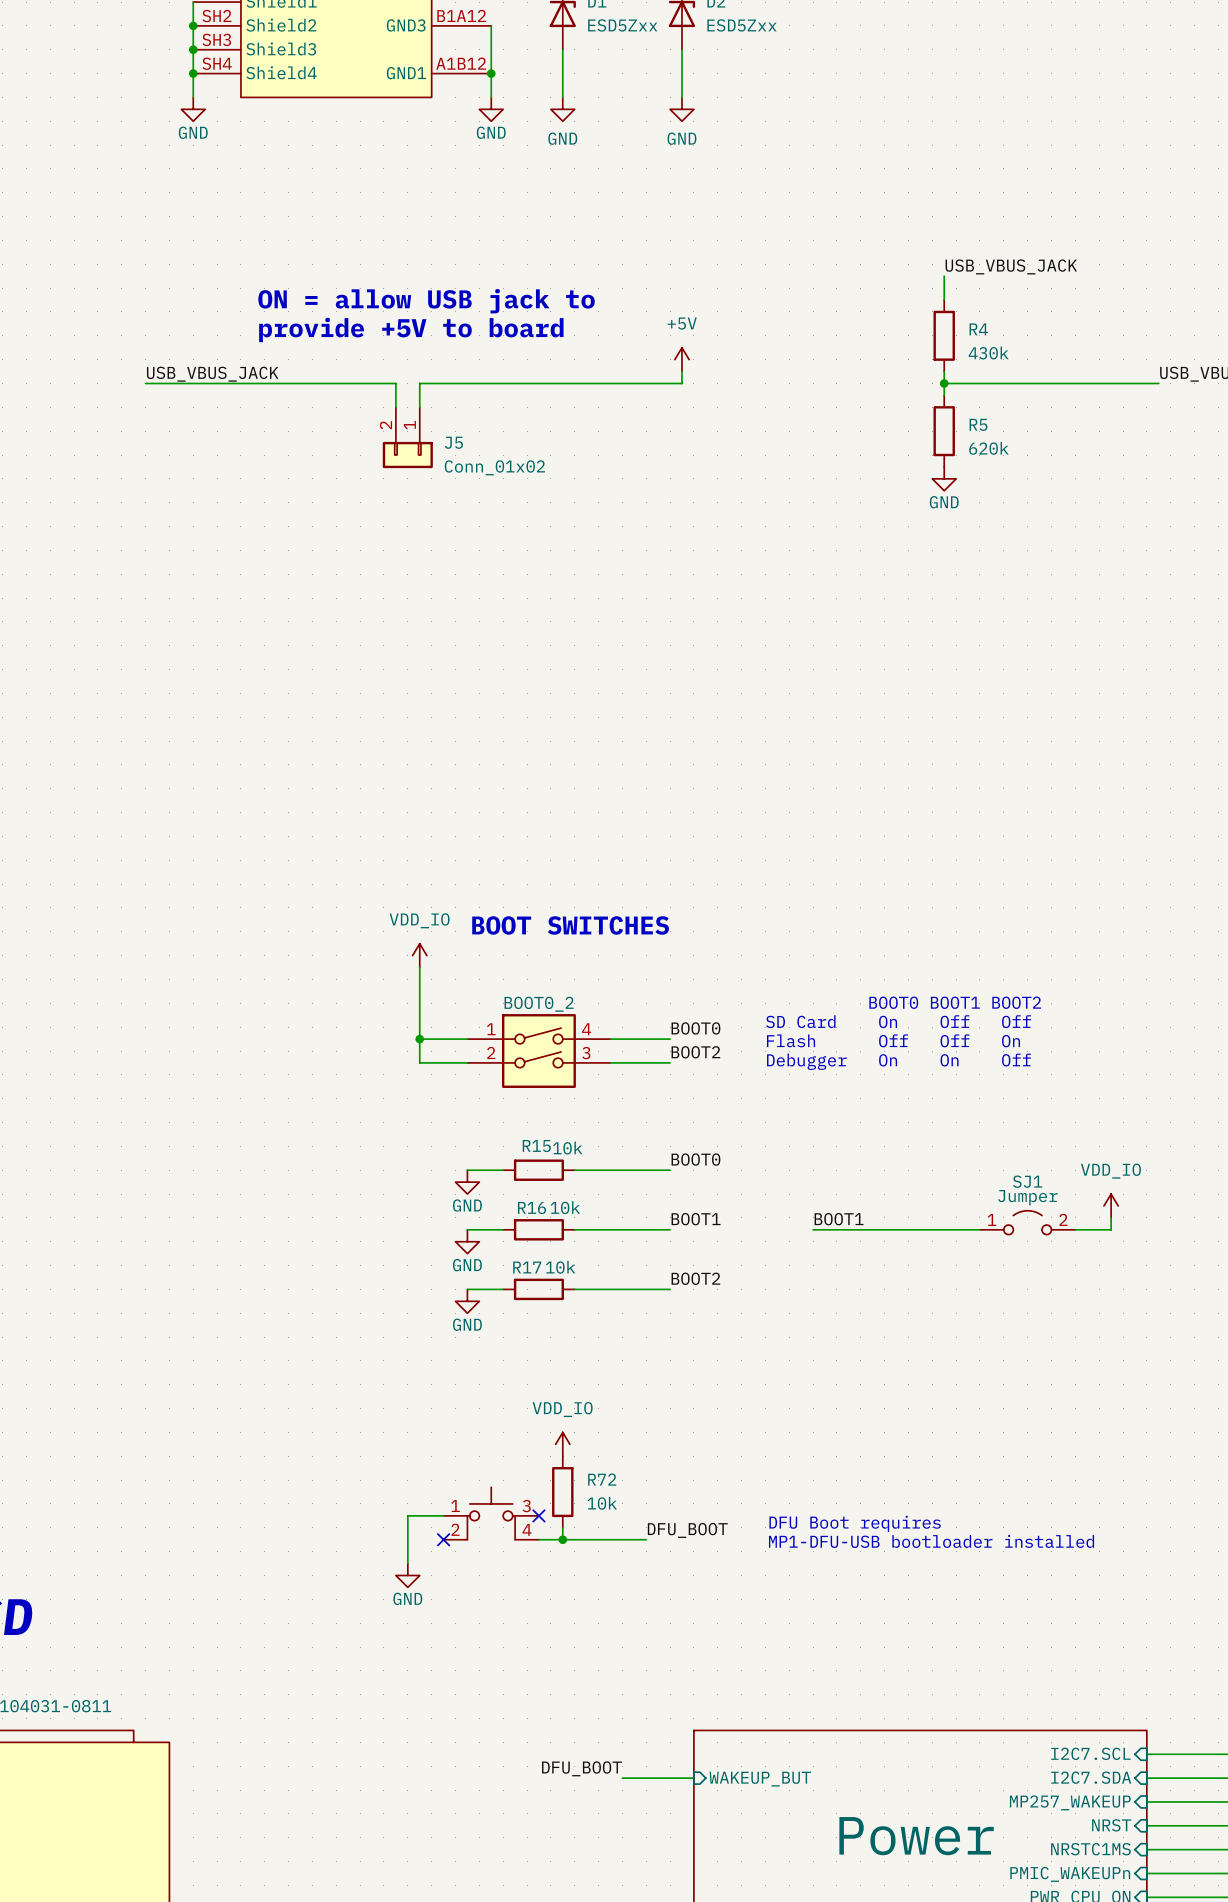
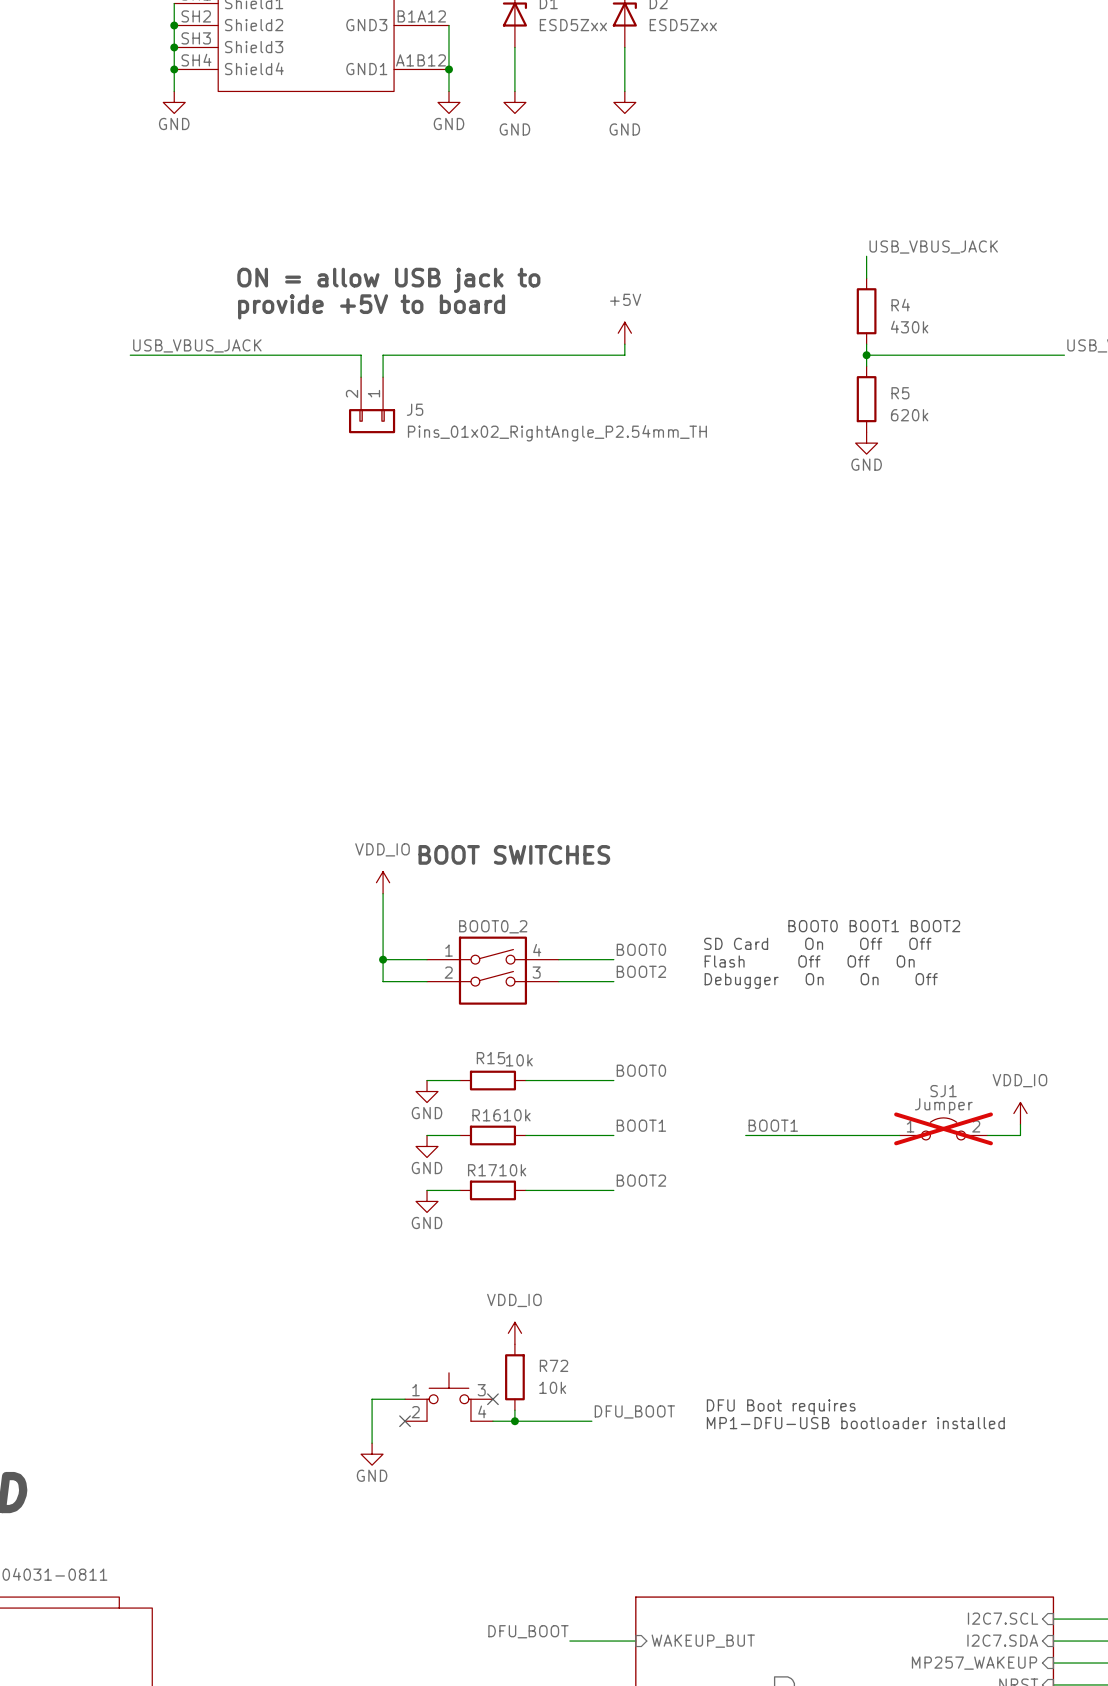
J5 value: Conn_01x02 (494, 467) -> Pins_01x02_RightAngle_P2.54mm_TH (557, 433)
SJ1 do-not-place cross: none -> (943, 1128)

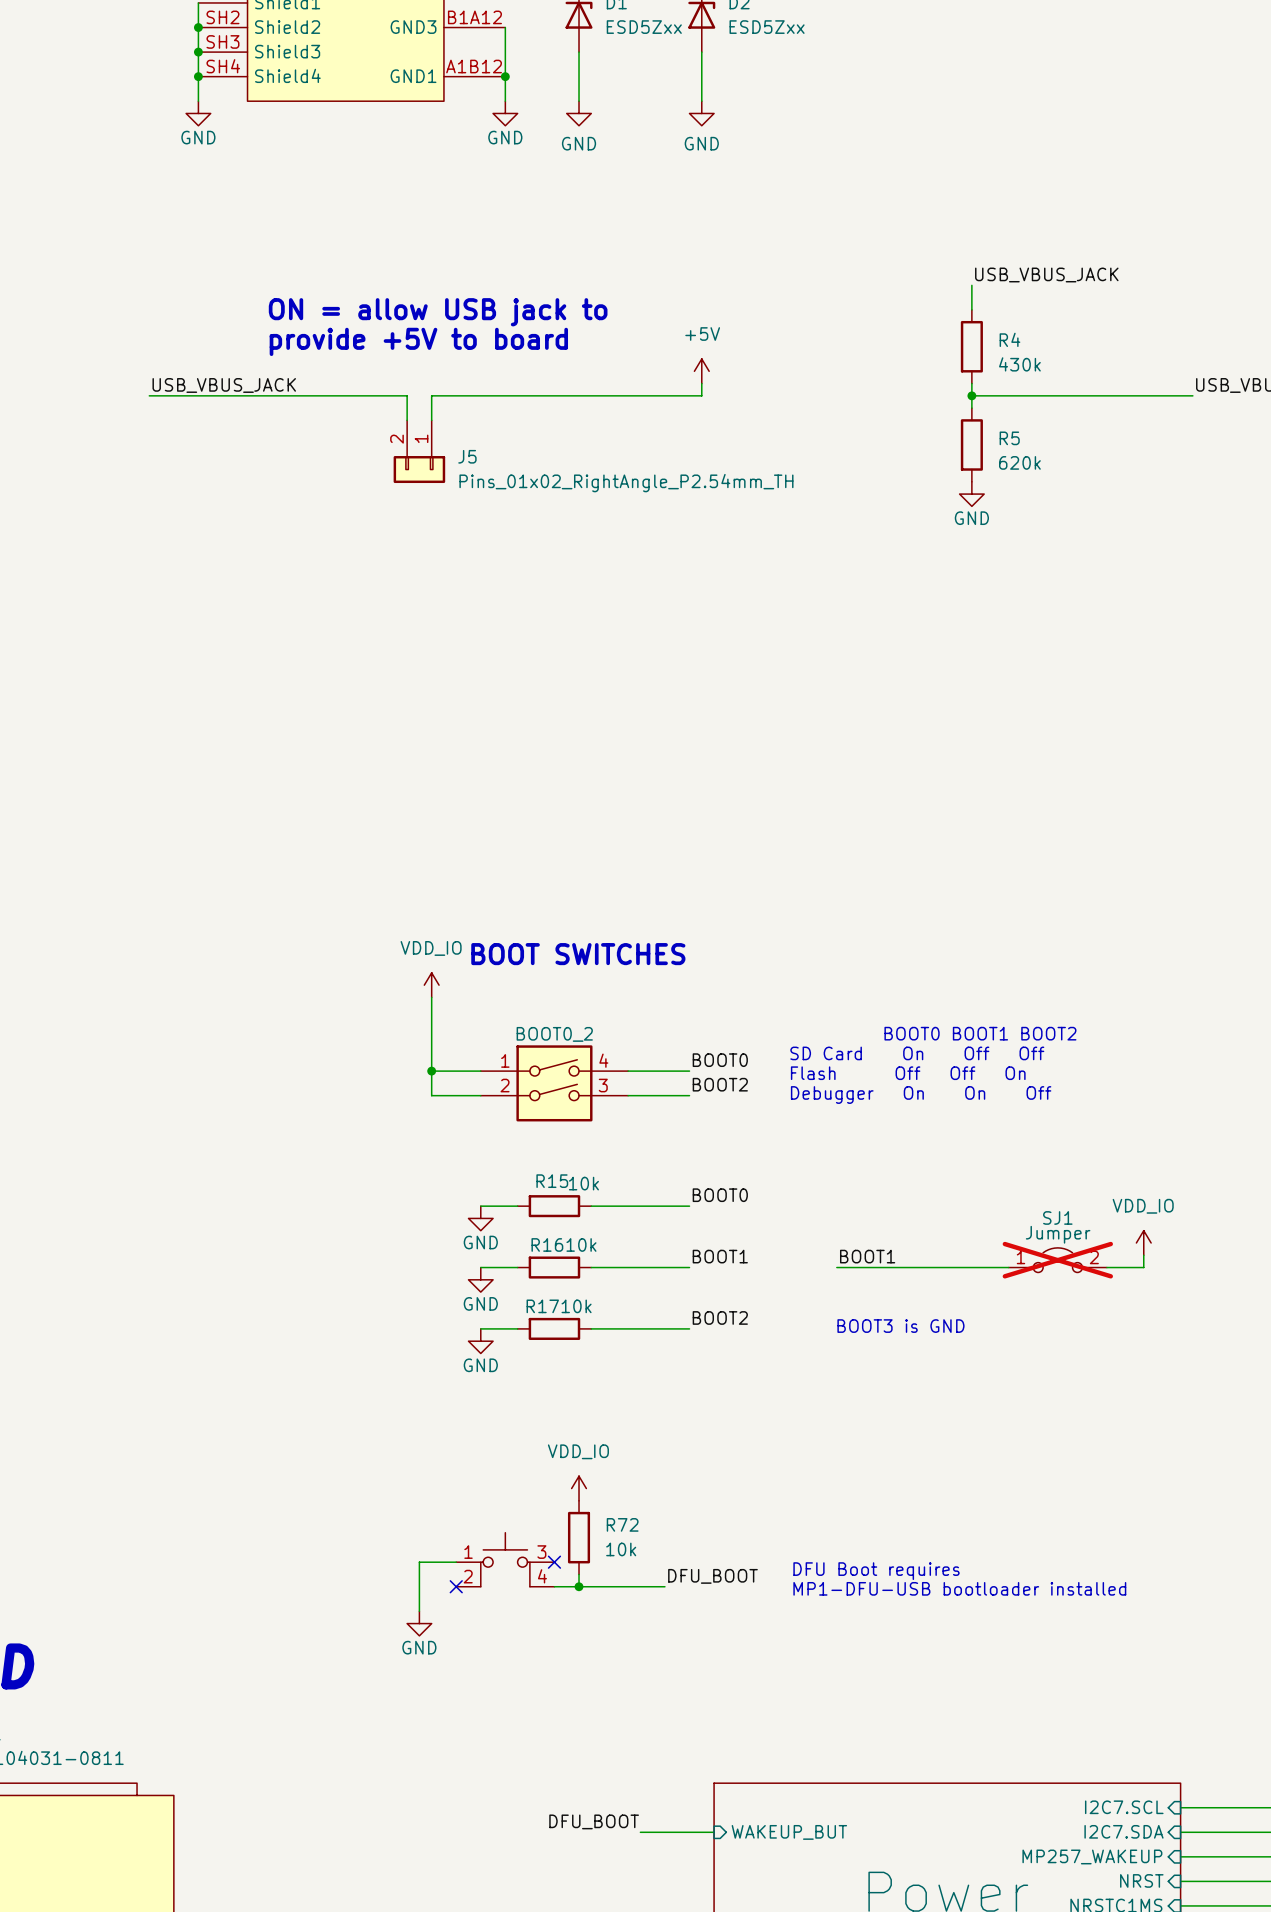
text: none -> BOOT3 is GND (900, 1326)

